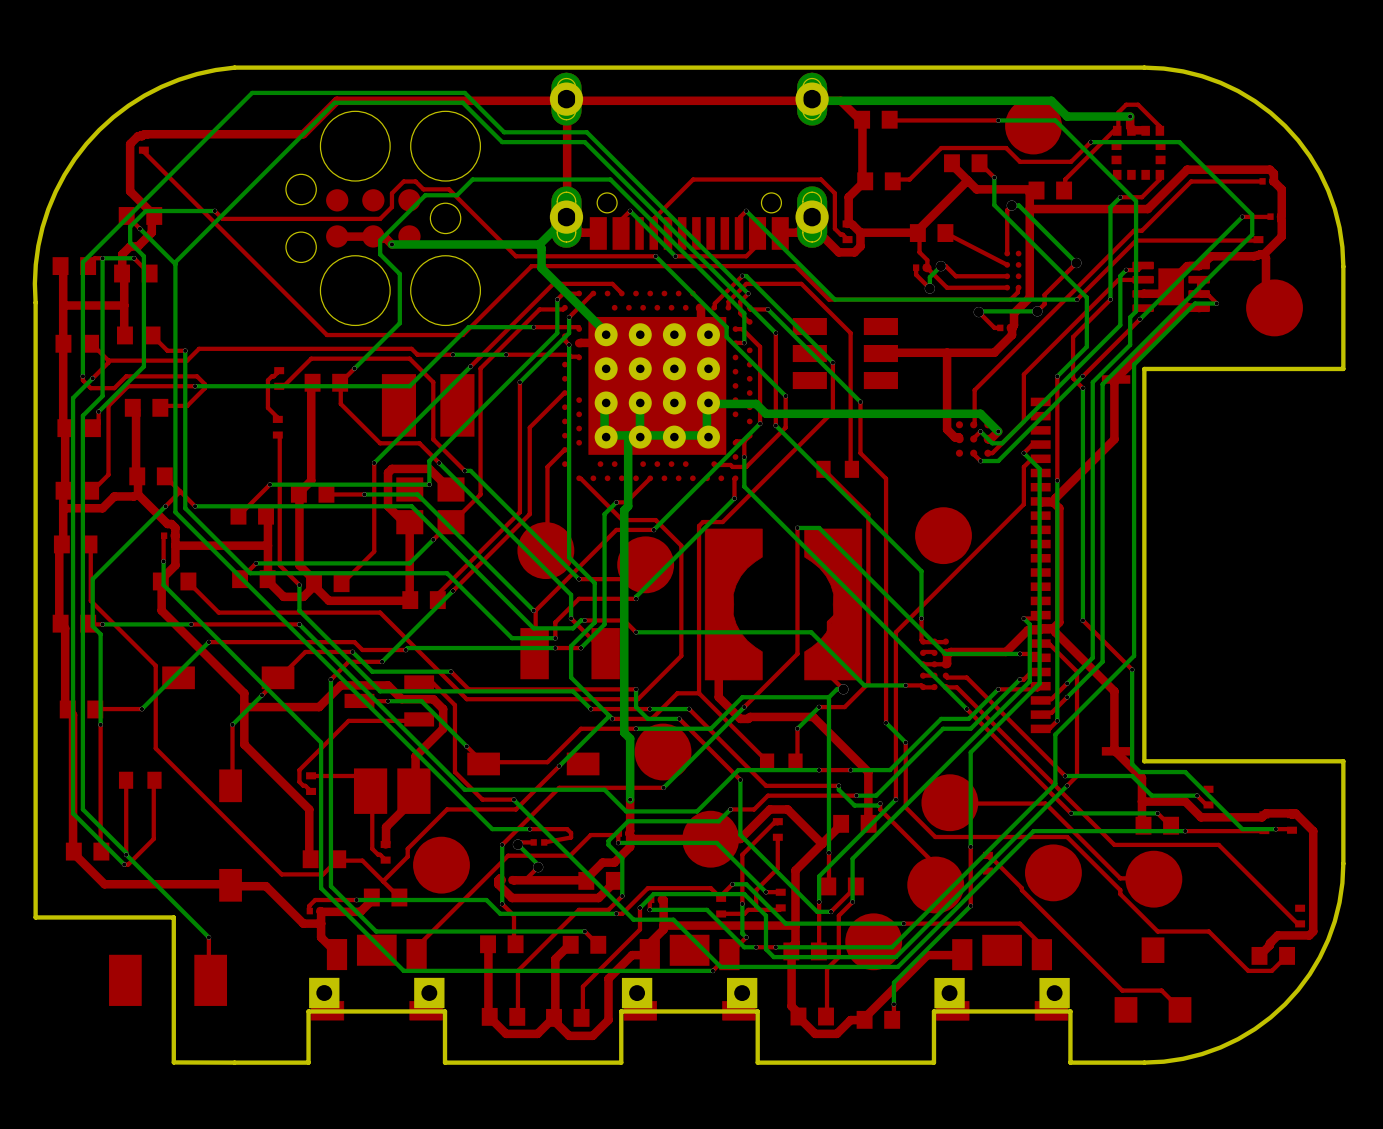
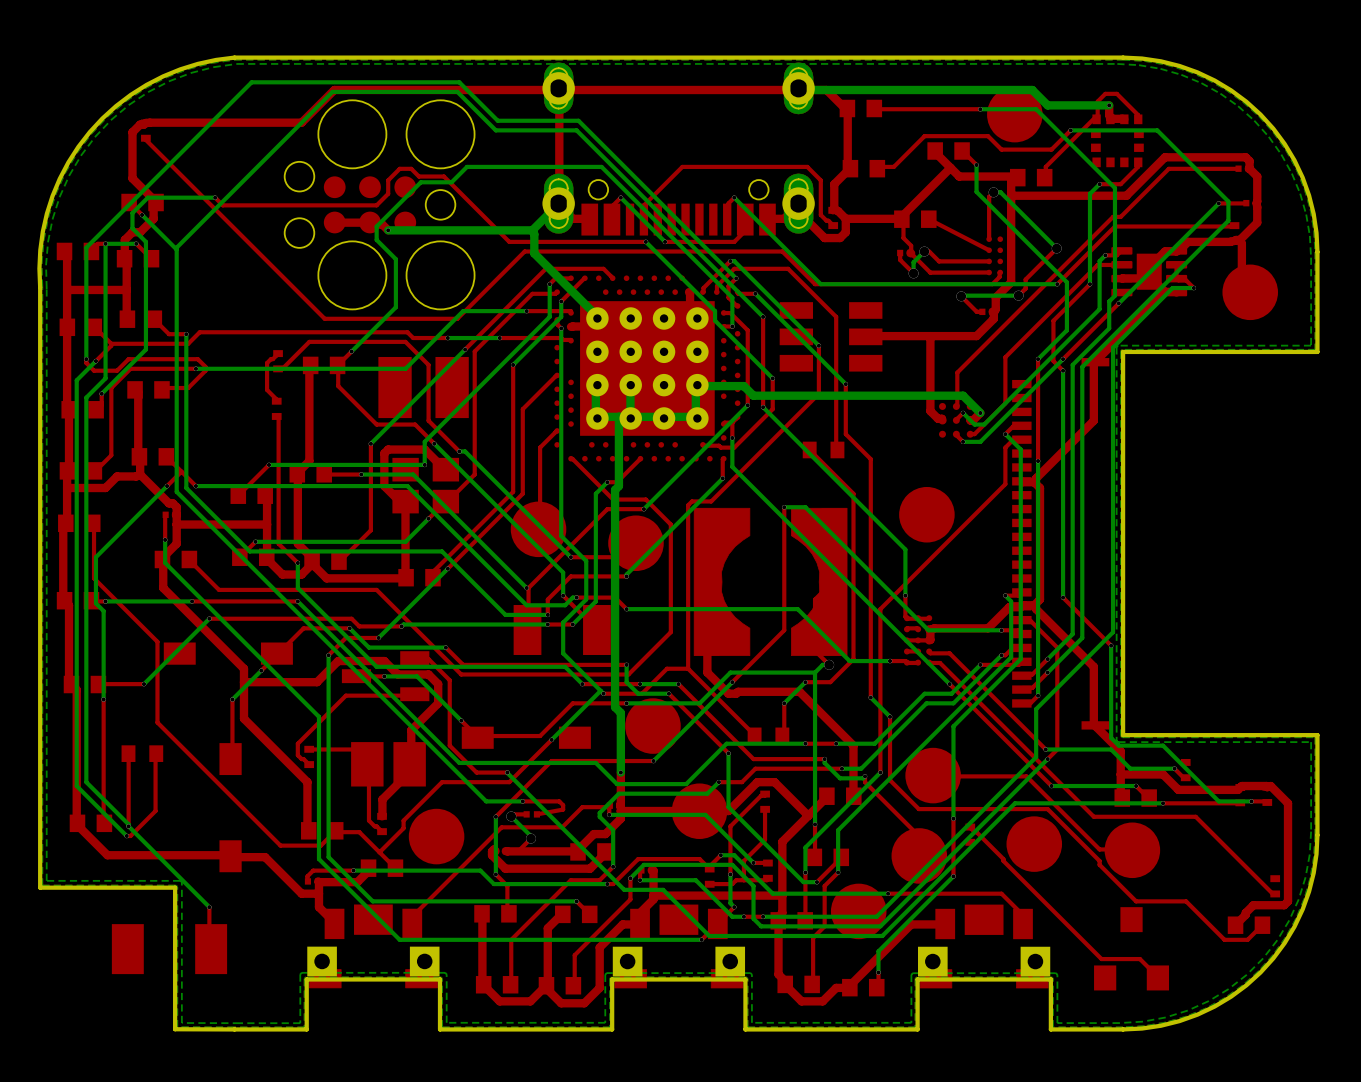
bottom zone outline: none -> (42, 286) (43, 239) (55, 194) (77, 152) (91, 133) (107, 116) (145, 88) (166, 77) (211, 62) (234, 59) (1123, 59) (1165, 64) (1206, 78) (1242, 101) (1273, 132) (1296, 168) (1304, 188) (1314, 230) (1315, 349) (1121, 350) (1120, 735) (1122, 737) (1315, 737) (1314, 856) (1310, 877) (1296, 918) (1273, 954) (1242, 985) (1206, 1008) (1186, 1016) (1144, 1026) (1053, 1027) (1053, 979) (1051, 977) (917, 977) (915, 979) (915, 1027) (747, 1027) (747, 979) (745, 977) (611, 977) (610, 979) (610, 1027) (442, 1027) (442, 979) (440, 977) (306, 977) (304, 979) (304, 1027) (177, 1027) (176, 886) (42, 885) (42, 287)
bottom zone outline: none -> (46, 288) (48, 241) (59, 196) (69, 175) (95, 136) (129, 104) (148, 91) (169, 81) (213, 67) (236, 63) (1117, 63) (1160, 68) (1201, 83) (1238, 106) (1254, 120) (1268, 136) (1291, 173) (1306, 214) (1309, 235) (1311, 345) (1116, 346) (1116, 740) (1118, 742) (1311, 742) (1309, 854) (1298, 899) (1289, 920) (1262, 958) (1228, 989) (1187, 1010) (1142, 1021) (1057, 1023) (1057, 974) (1055, 973) (913, 973) (911, 974) (911, 1022) (751, 1022) (751, 974) (750, 973) (606, 973) (605, 974) (605, 1022) (446, 1022) (446, 974) (444, 972) (301, 972) (300, 974) (300, 1023) (181, 1023) (181, 881) (46, 880) (46, 289)

